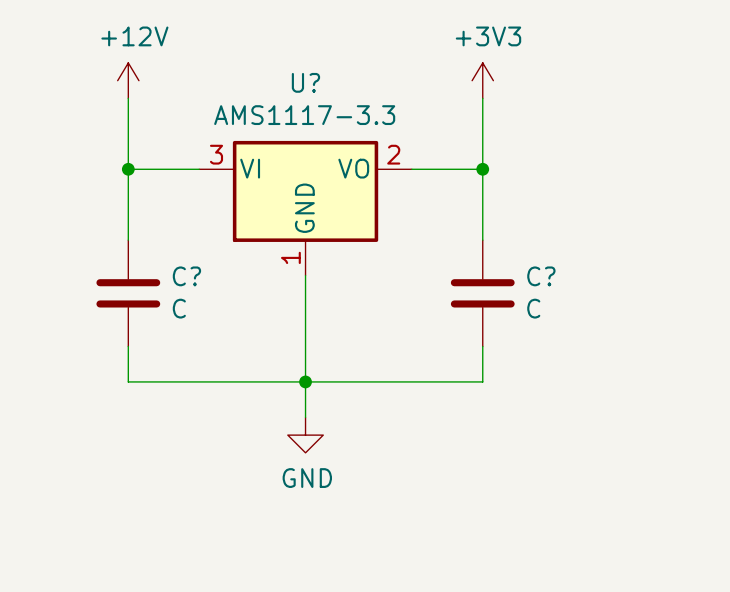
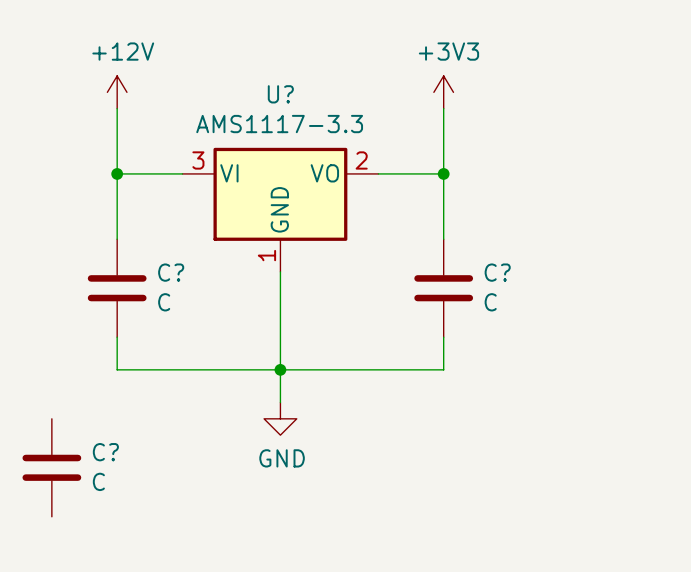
C?: none -> C (51, 467)

